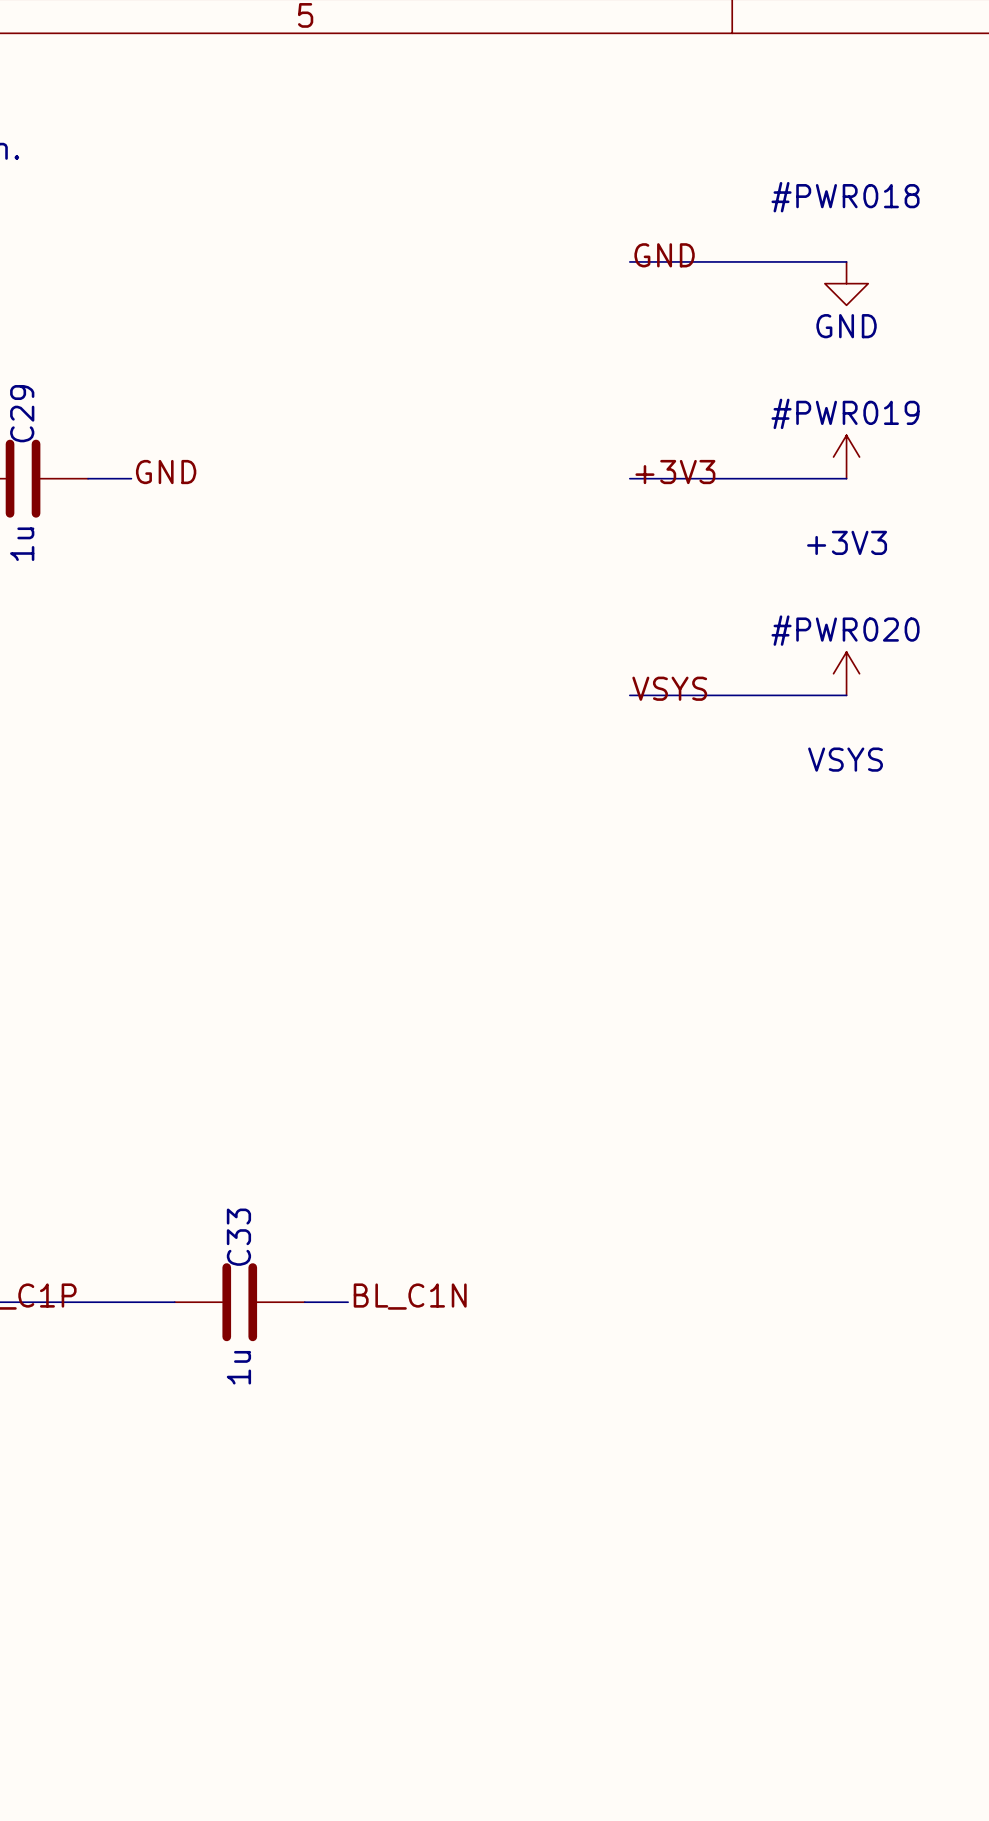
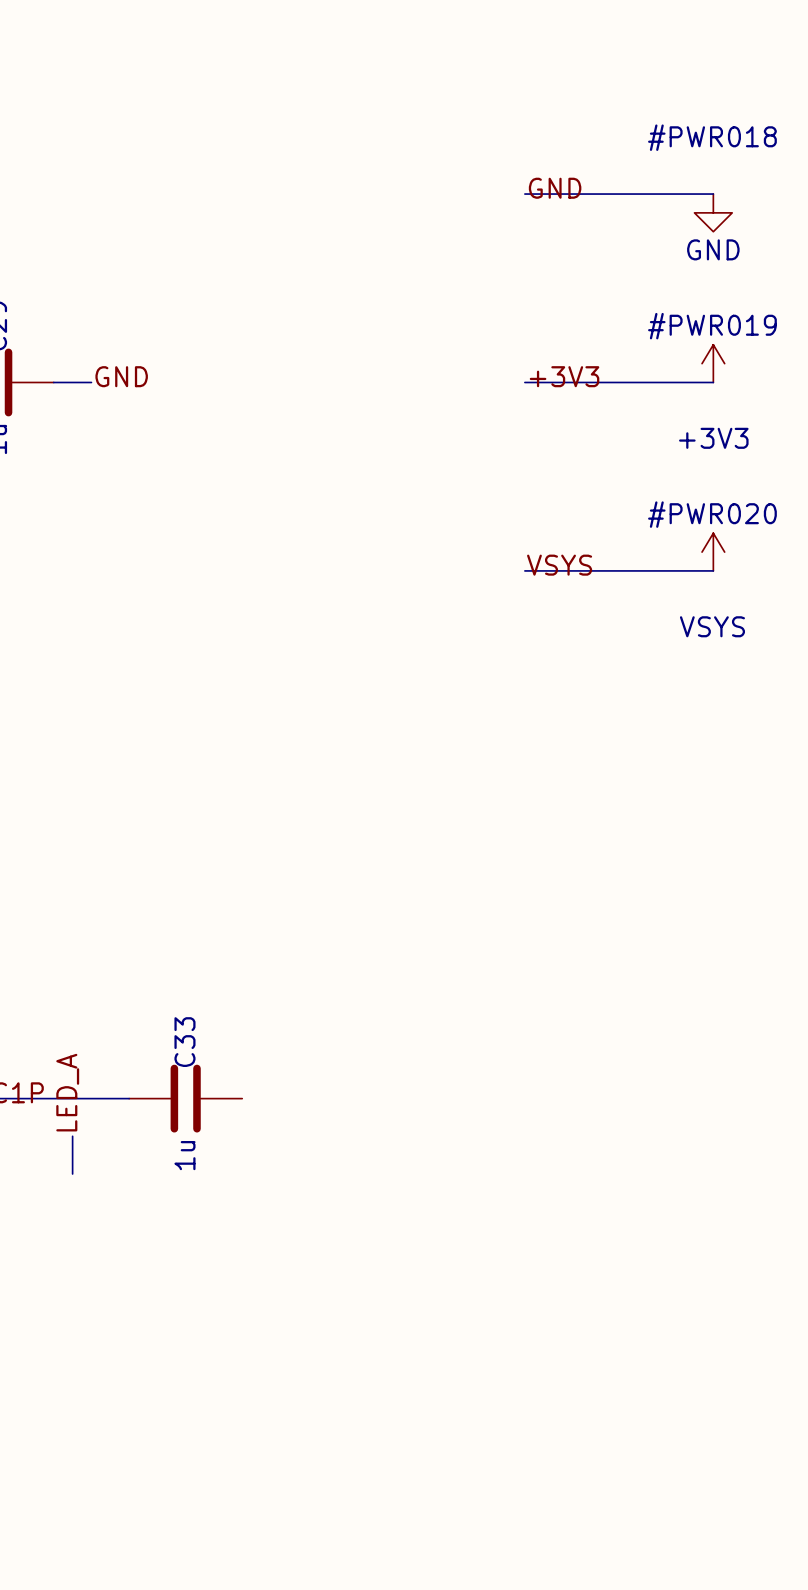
label: none -> LED_A (67, 1092)
label: BL_C1N (410, 1296) -> none
wire: (304, 1302) (348, 1302) -> none
wire: none -> (72, 1136) (72, 1173)

